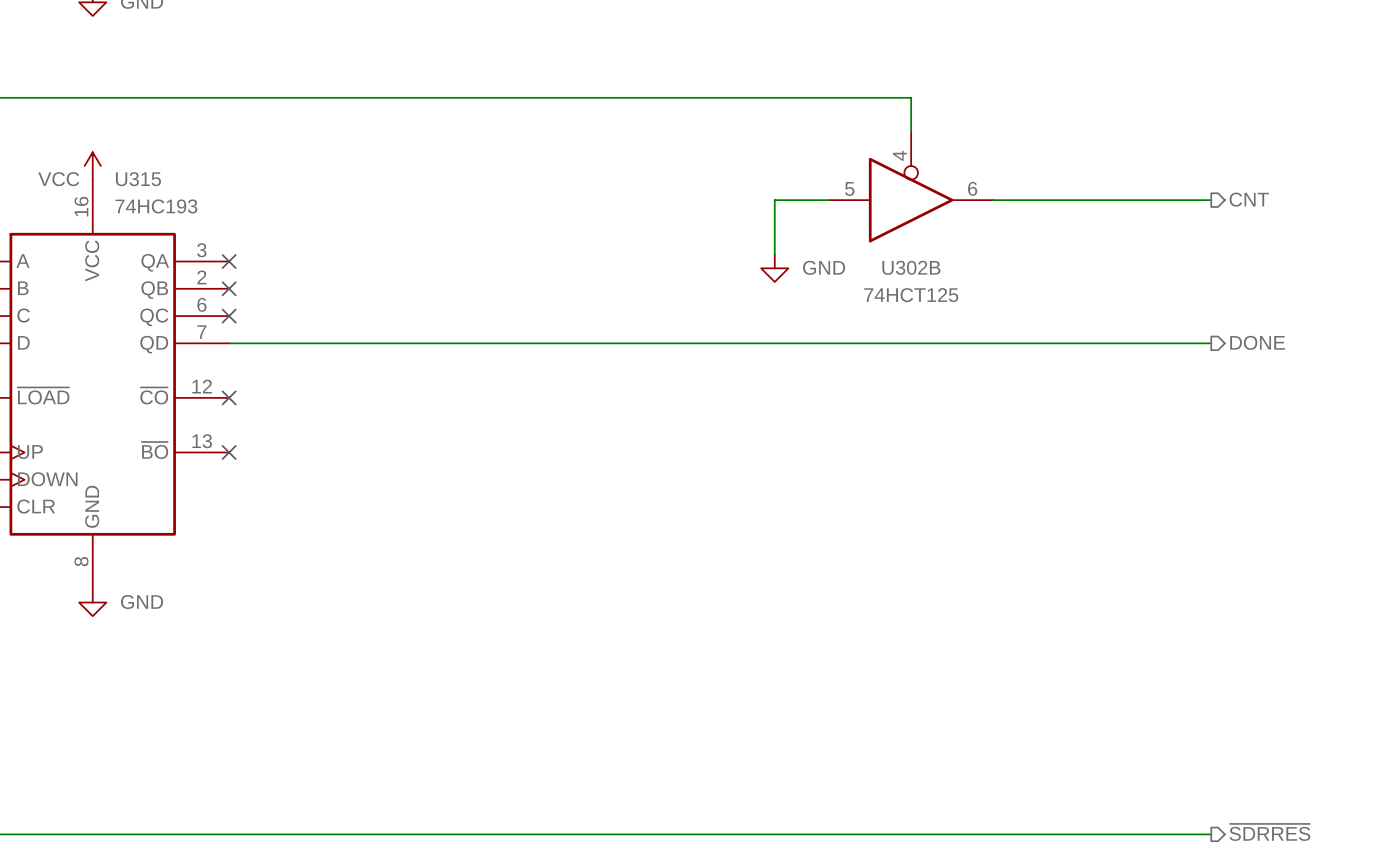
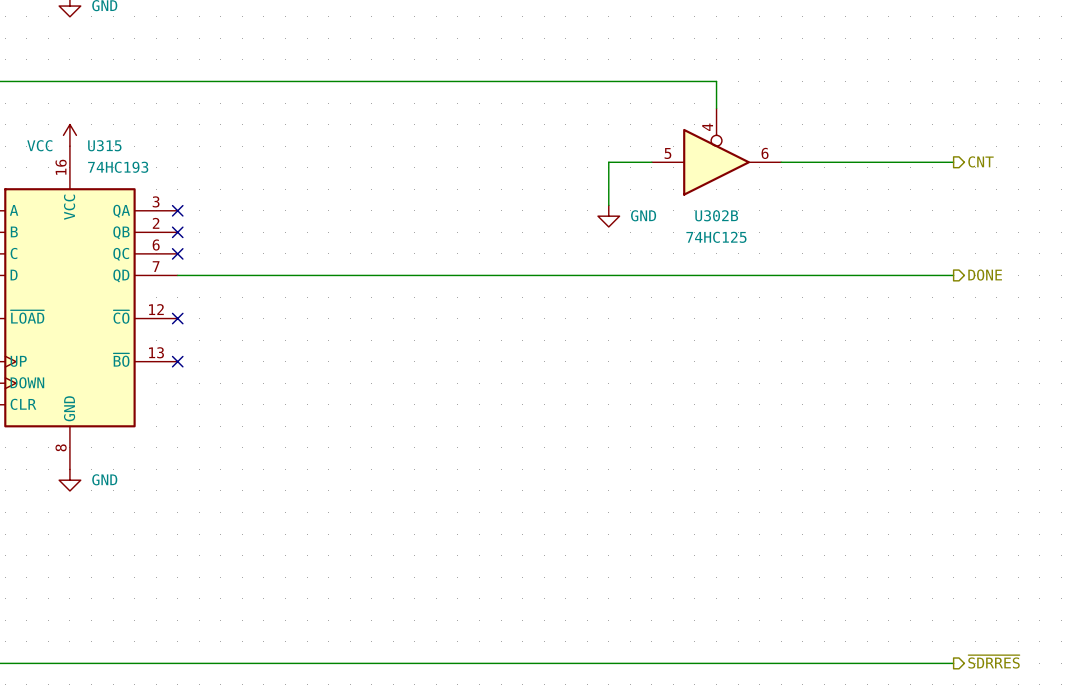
U302B value: 74HCT125 (911, 295) -> 74HC125 (716, 237)

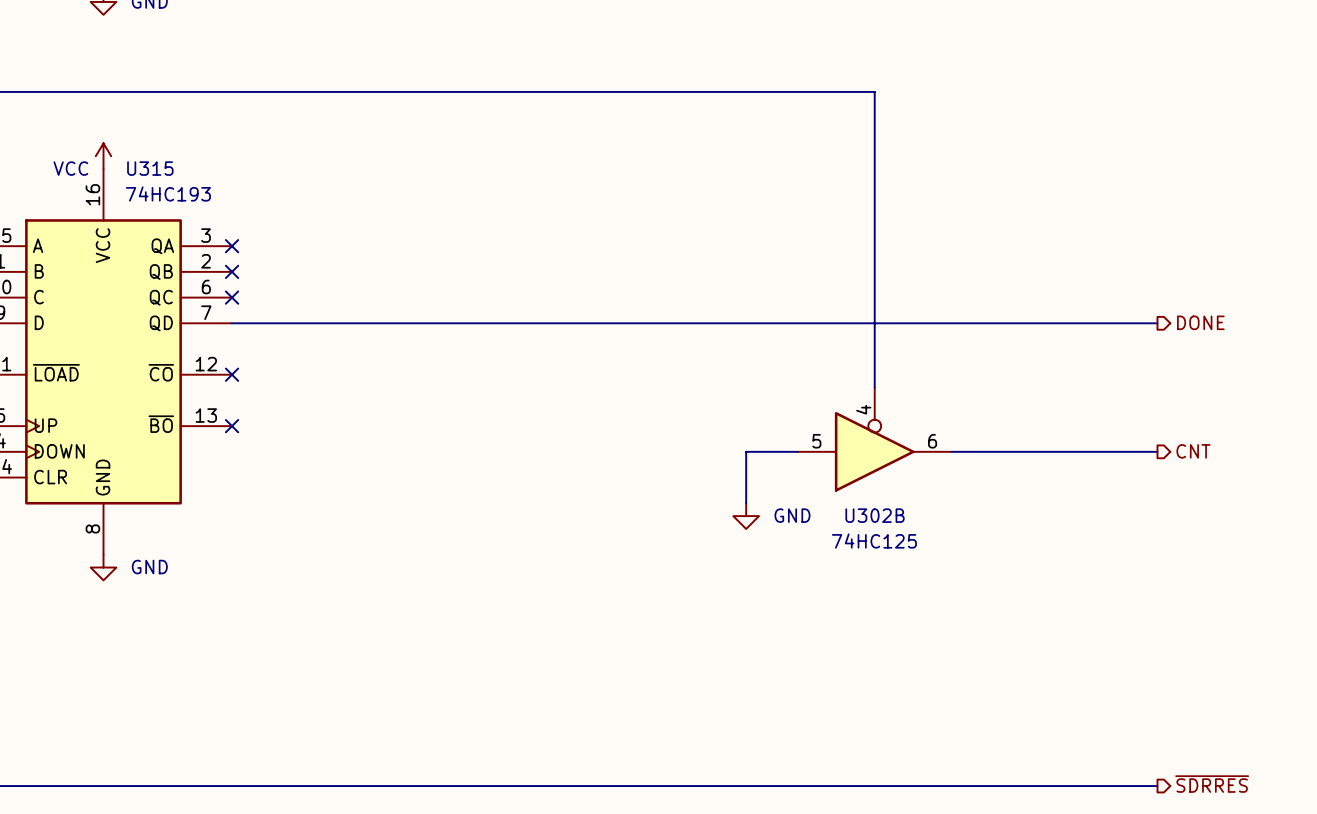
wire: none -> (874, 124) (874, 387)
U302B position: (716, 152) -> (874, 439)
hierarchical label: CNT (980, 161) -> none
wire: (651, 162) (608, 162) (608, 205) -> none
wire: (781, 162) (953, 162) -> none
power symbol: GND (608, 216) -> none
hierarchical label: none -> CNT (1193, 451)
wire: none -> (797, 451) (746, 451) (746, 503)
wire: none -> (951, 451) (1157, 451)
power symbol: none -> GND (746, 516)

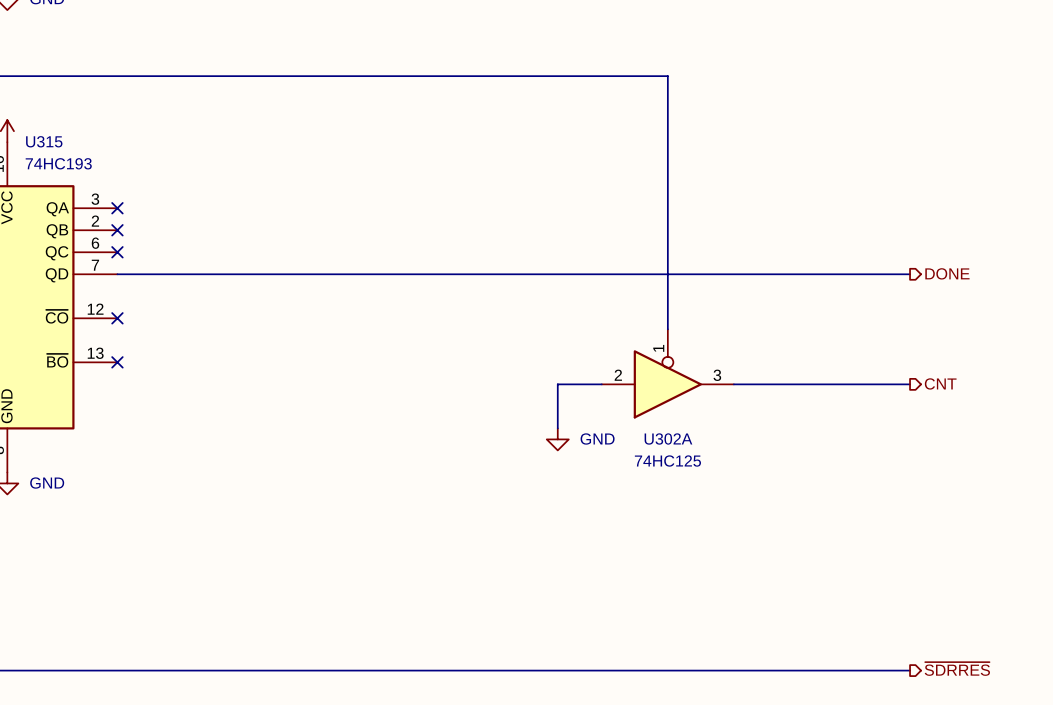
U302B pin number: 4 (863, 409) -> 1 (658, 348)
U302B pin number: 5 (816, 441) -> 2 (618, 375)
U302B pin number: 6 (932, 441) -> 3 (717, 375)
U302B name: U302B (875, 515) -> U302A (668, 438)

